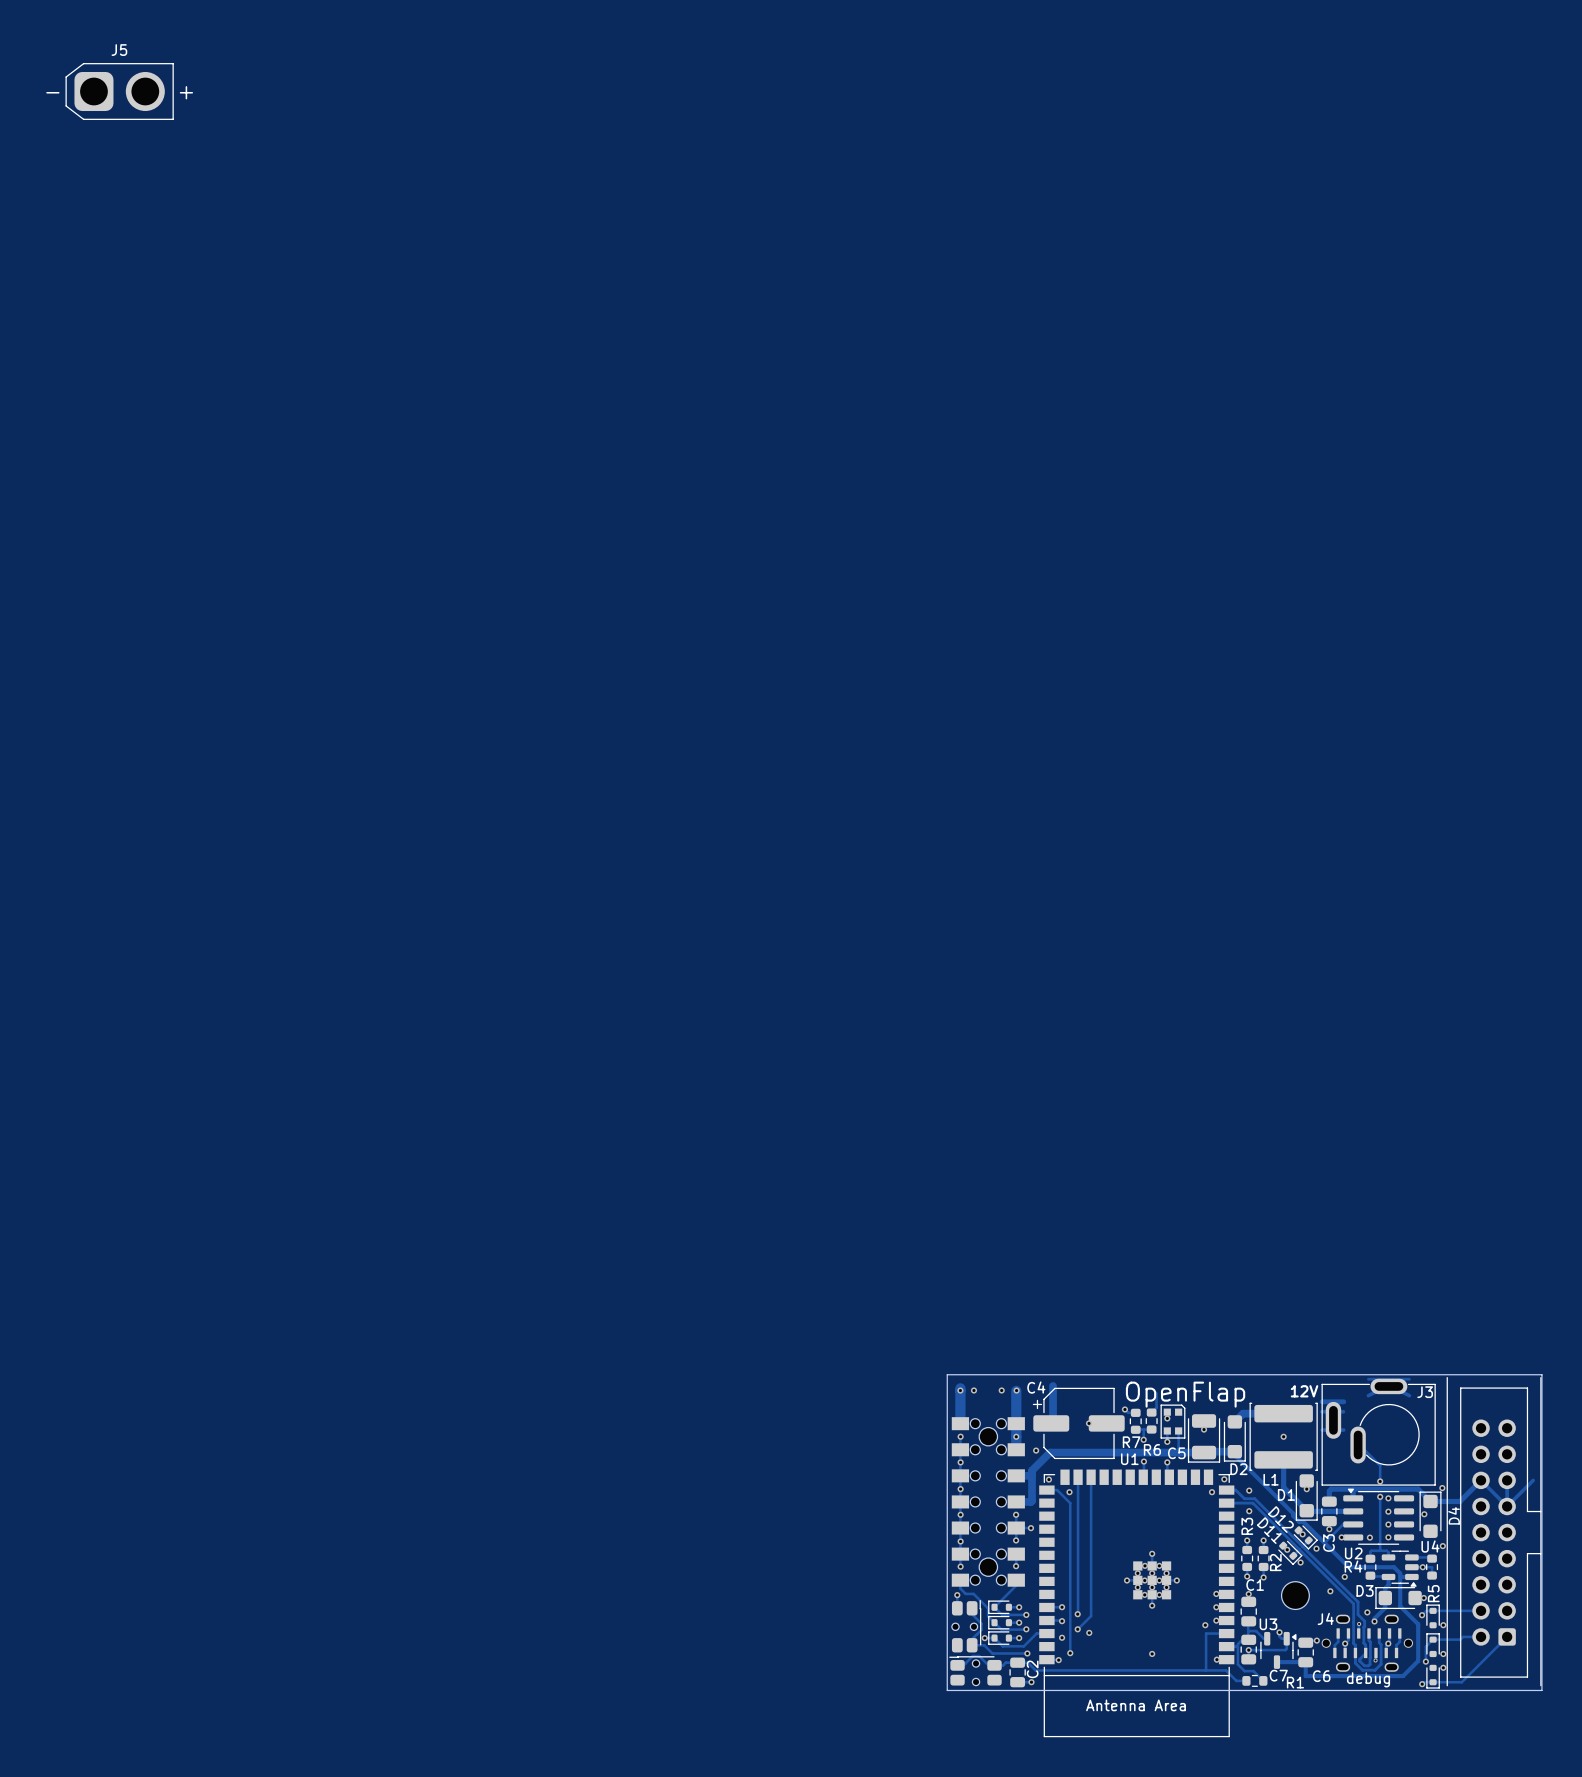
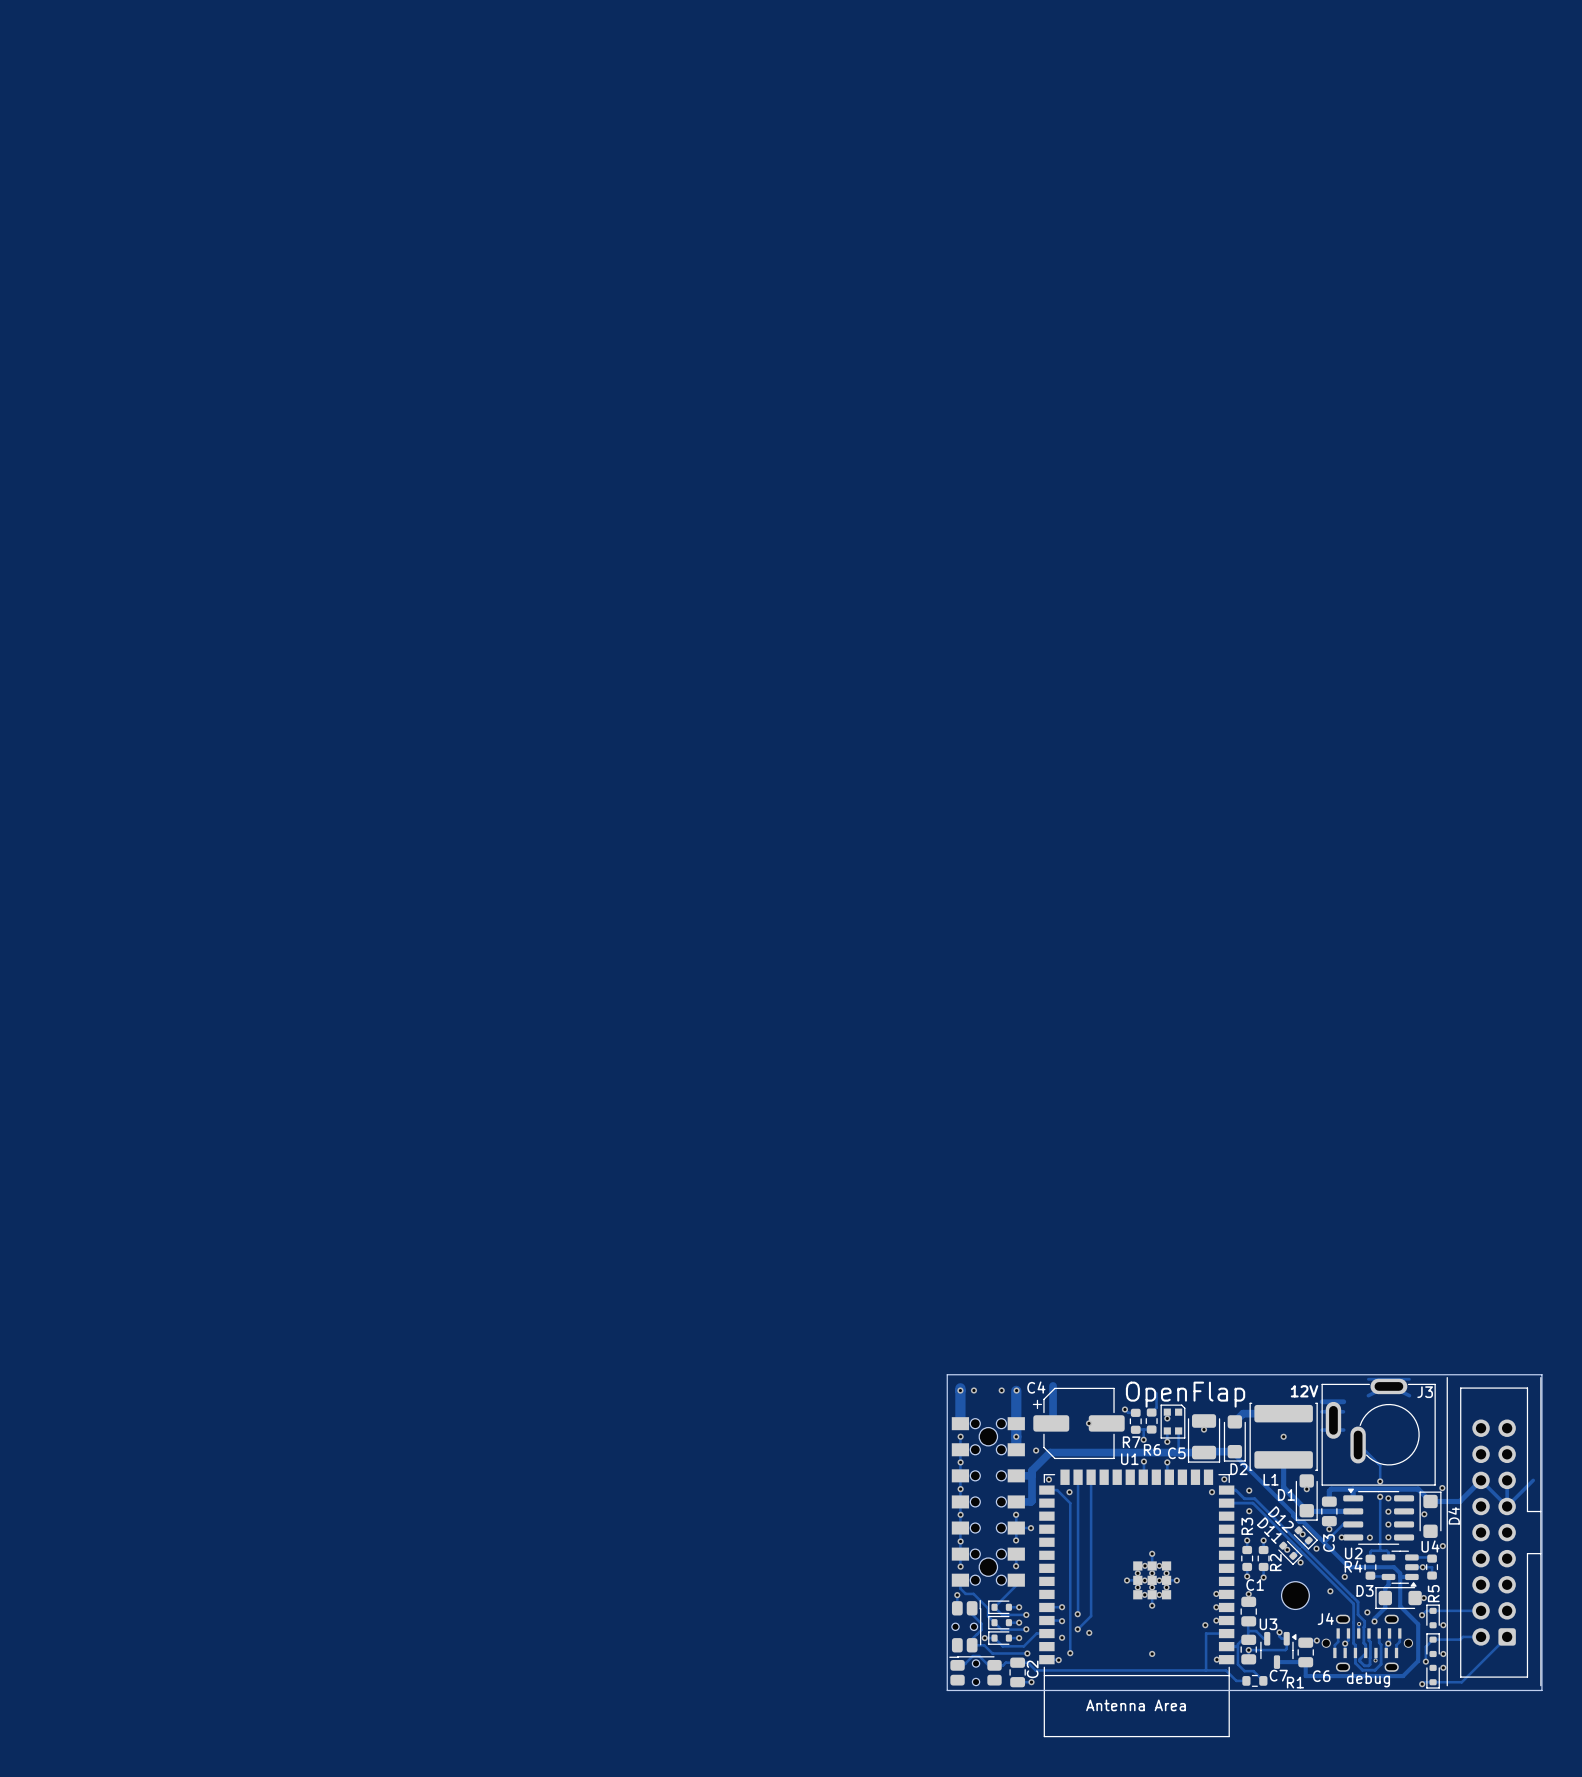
J5: (119, 91) -> none

